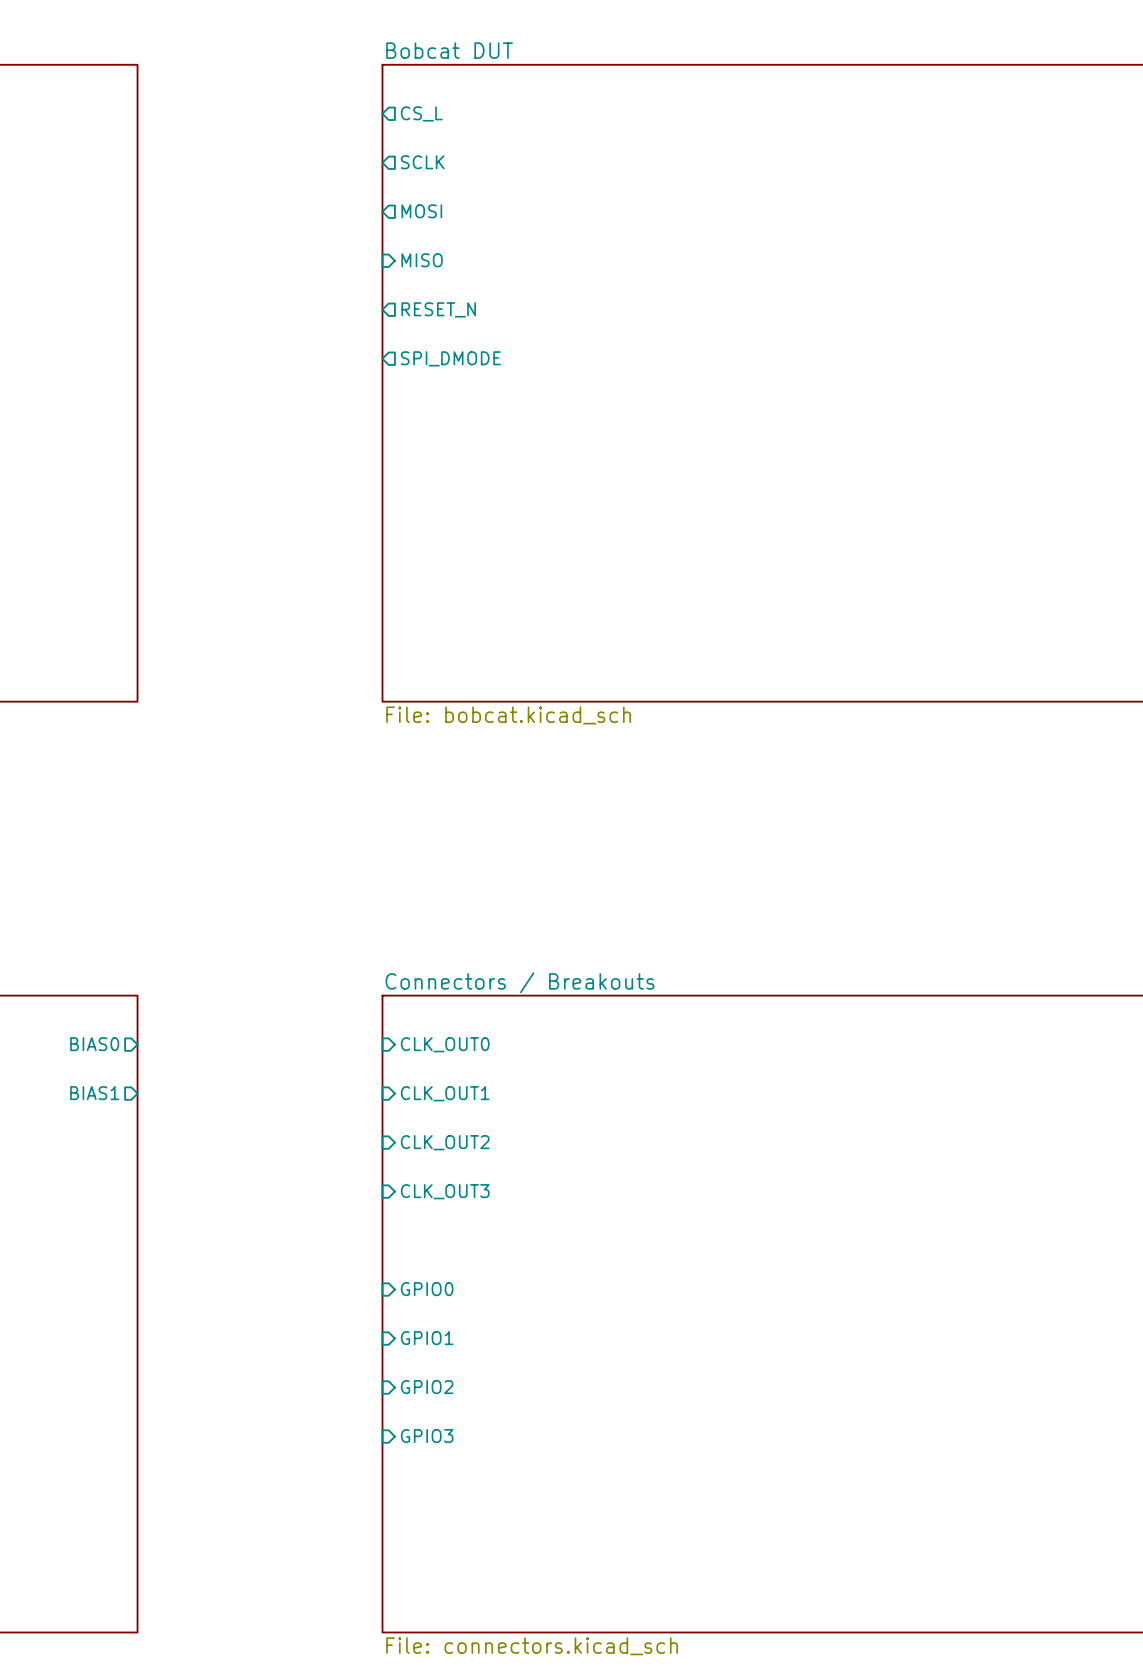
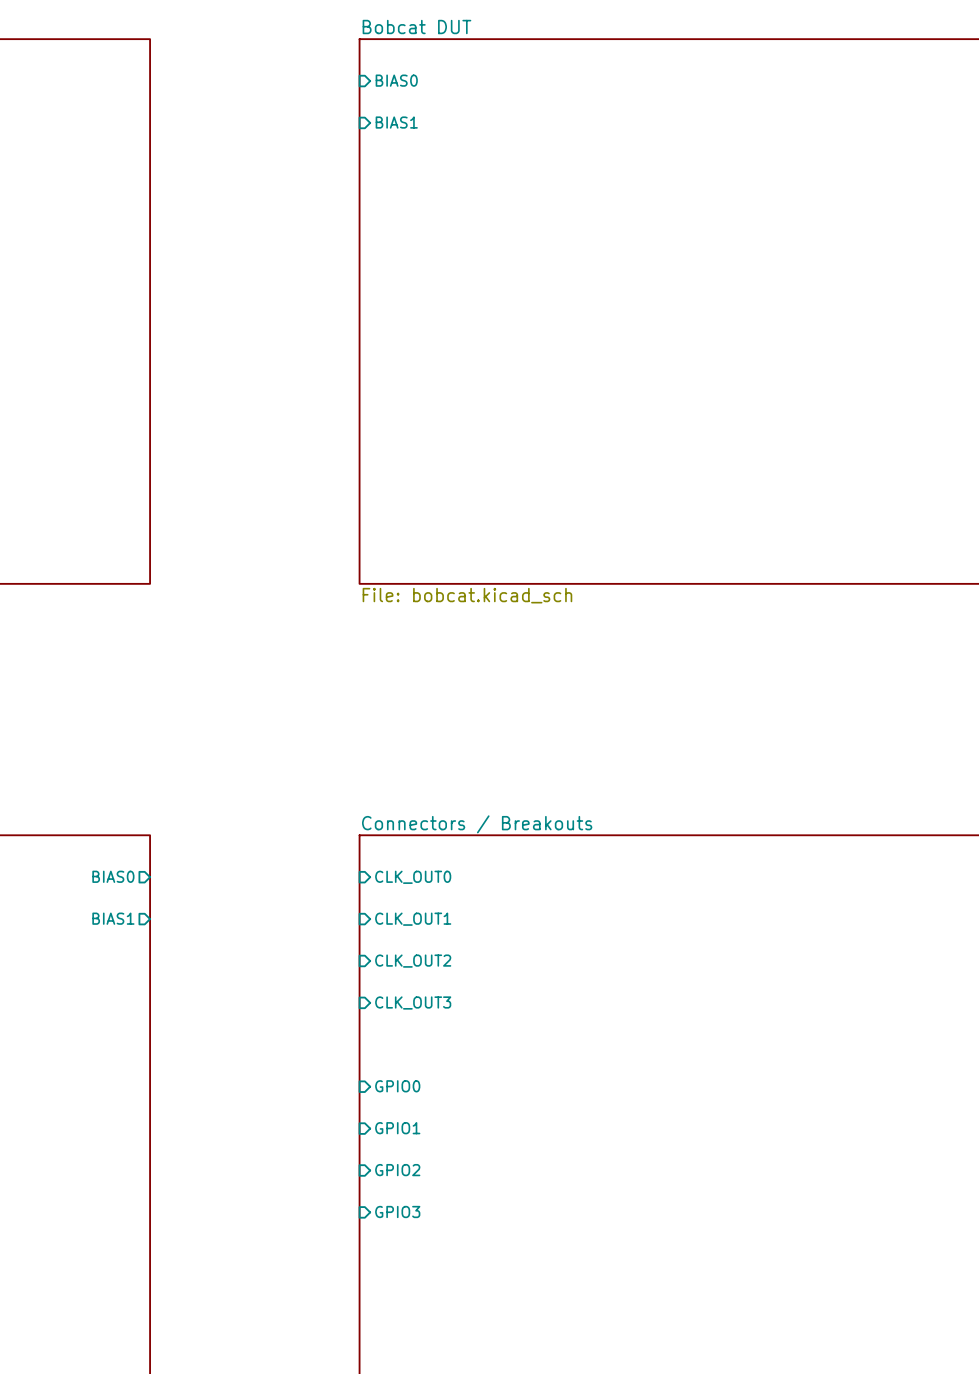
sheet pin shape: output (421, 113) -> input (396, 80)
sheet pin: CS_L (421, 113) -> BIAS0 (396, 80)
sheet pin shape: output (422, 162) -> input (396, 122)
sheet pin: SCLK (422, 162) -> BIAS1 (396, 122)
sheet pin: MOSI (421, 211) -> none
sheet pin: MISO (422, 260) -> none
sheet pin: RESET_N (438, 309) -> none
sheet pin: SPI_DMODE (450, 358) -> none

